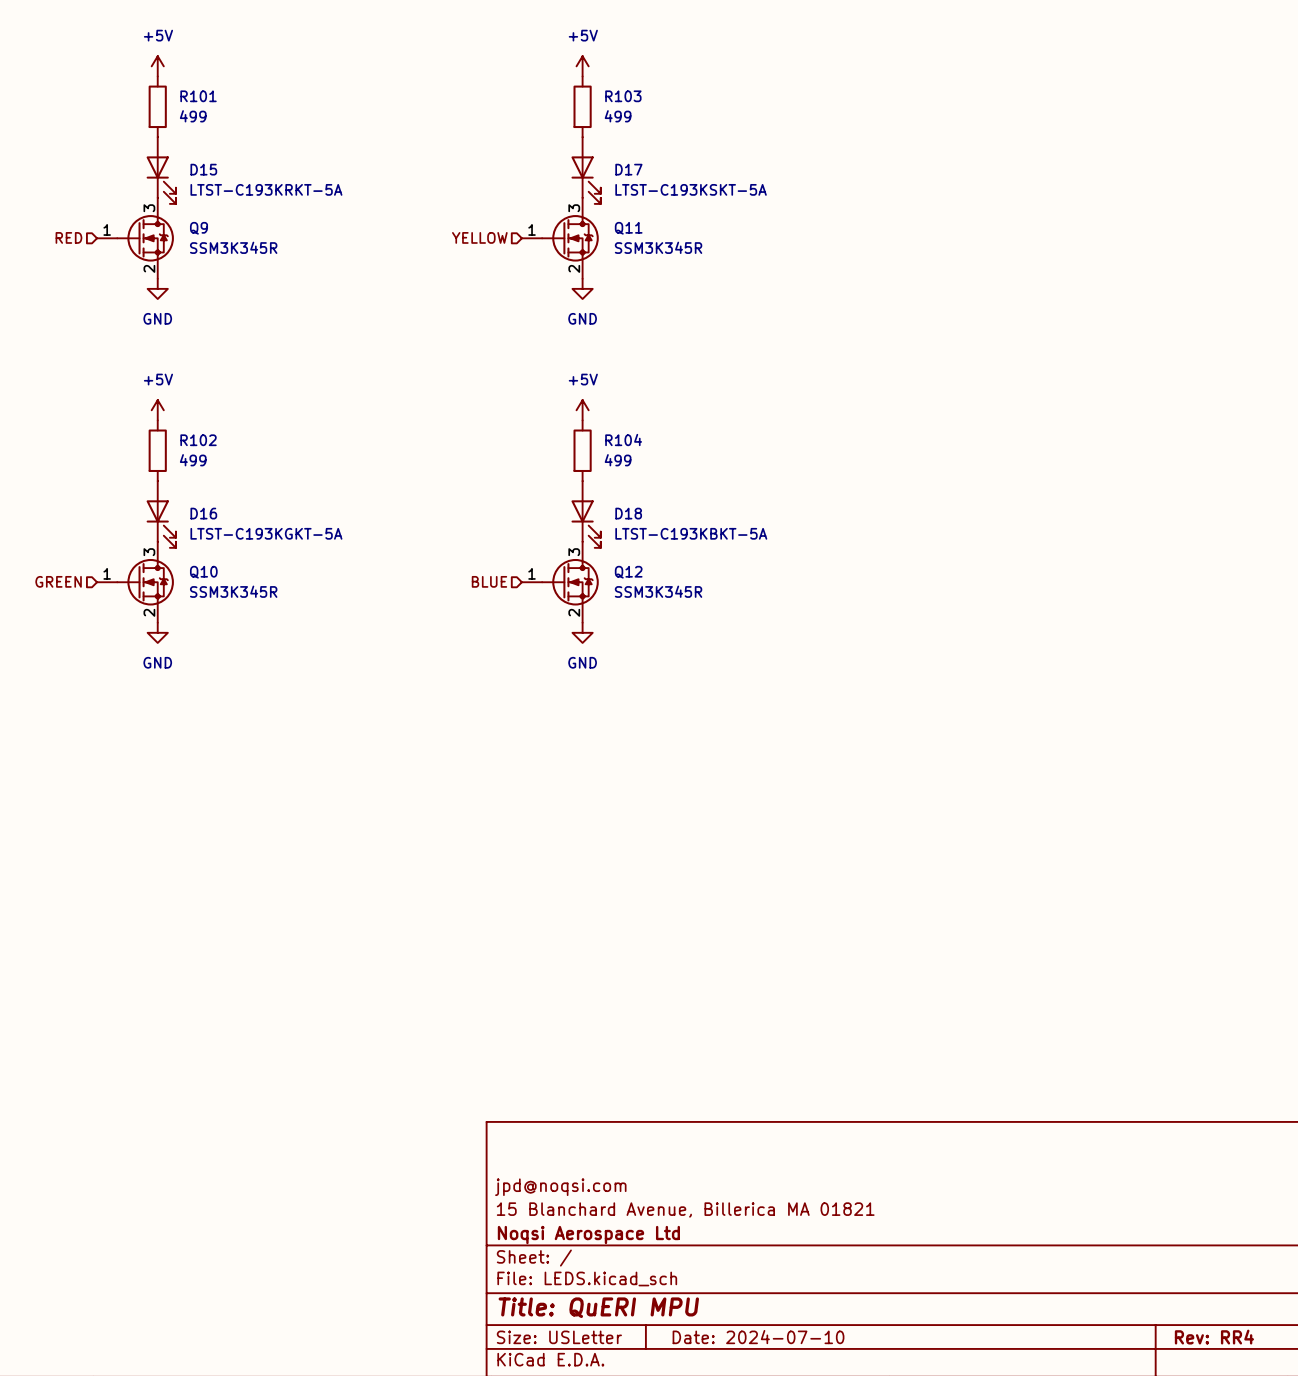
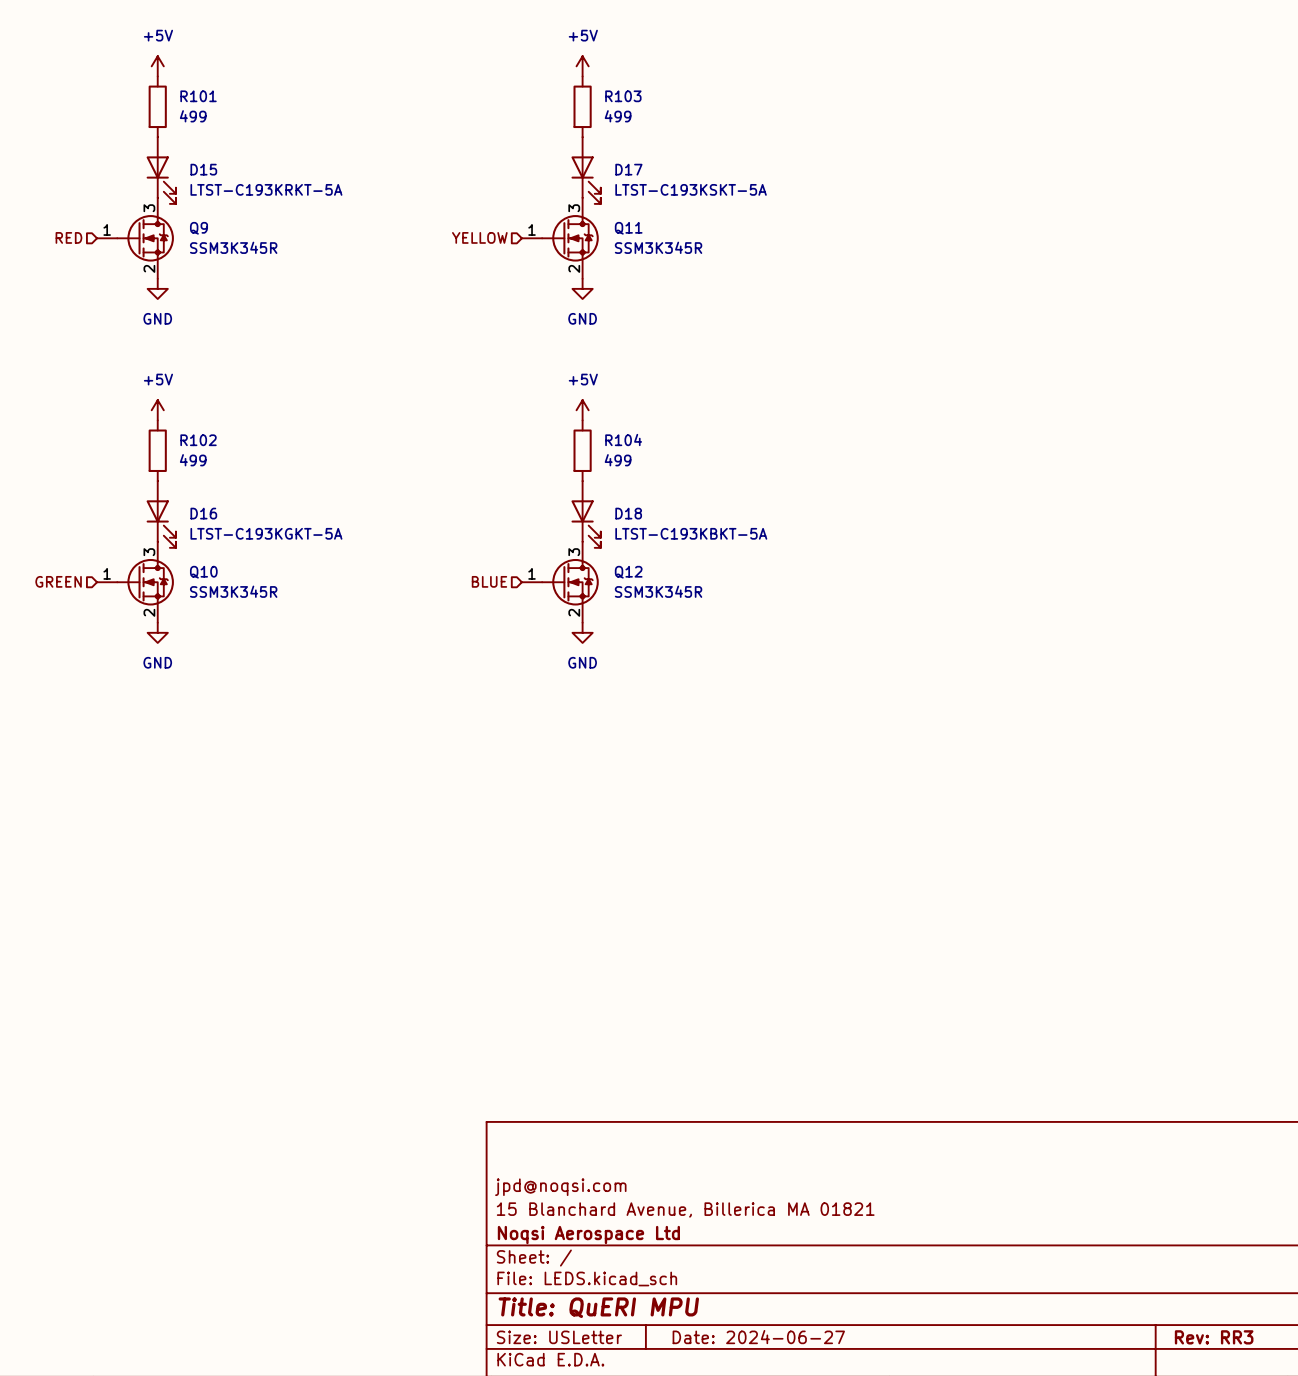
title block: Date: 2024-07-10 (758, 1337) -> Date: 2024-06-27 (758, 1337)
title block: Rev: RR4 (1214, 1337) -> Rev: RR3 (1214, 1337)

